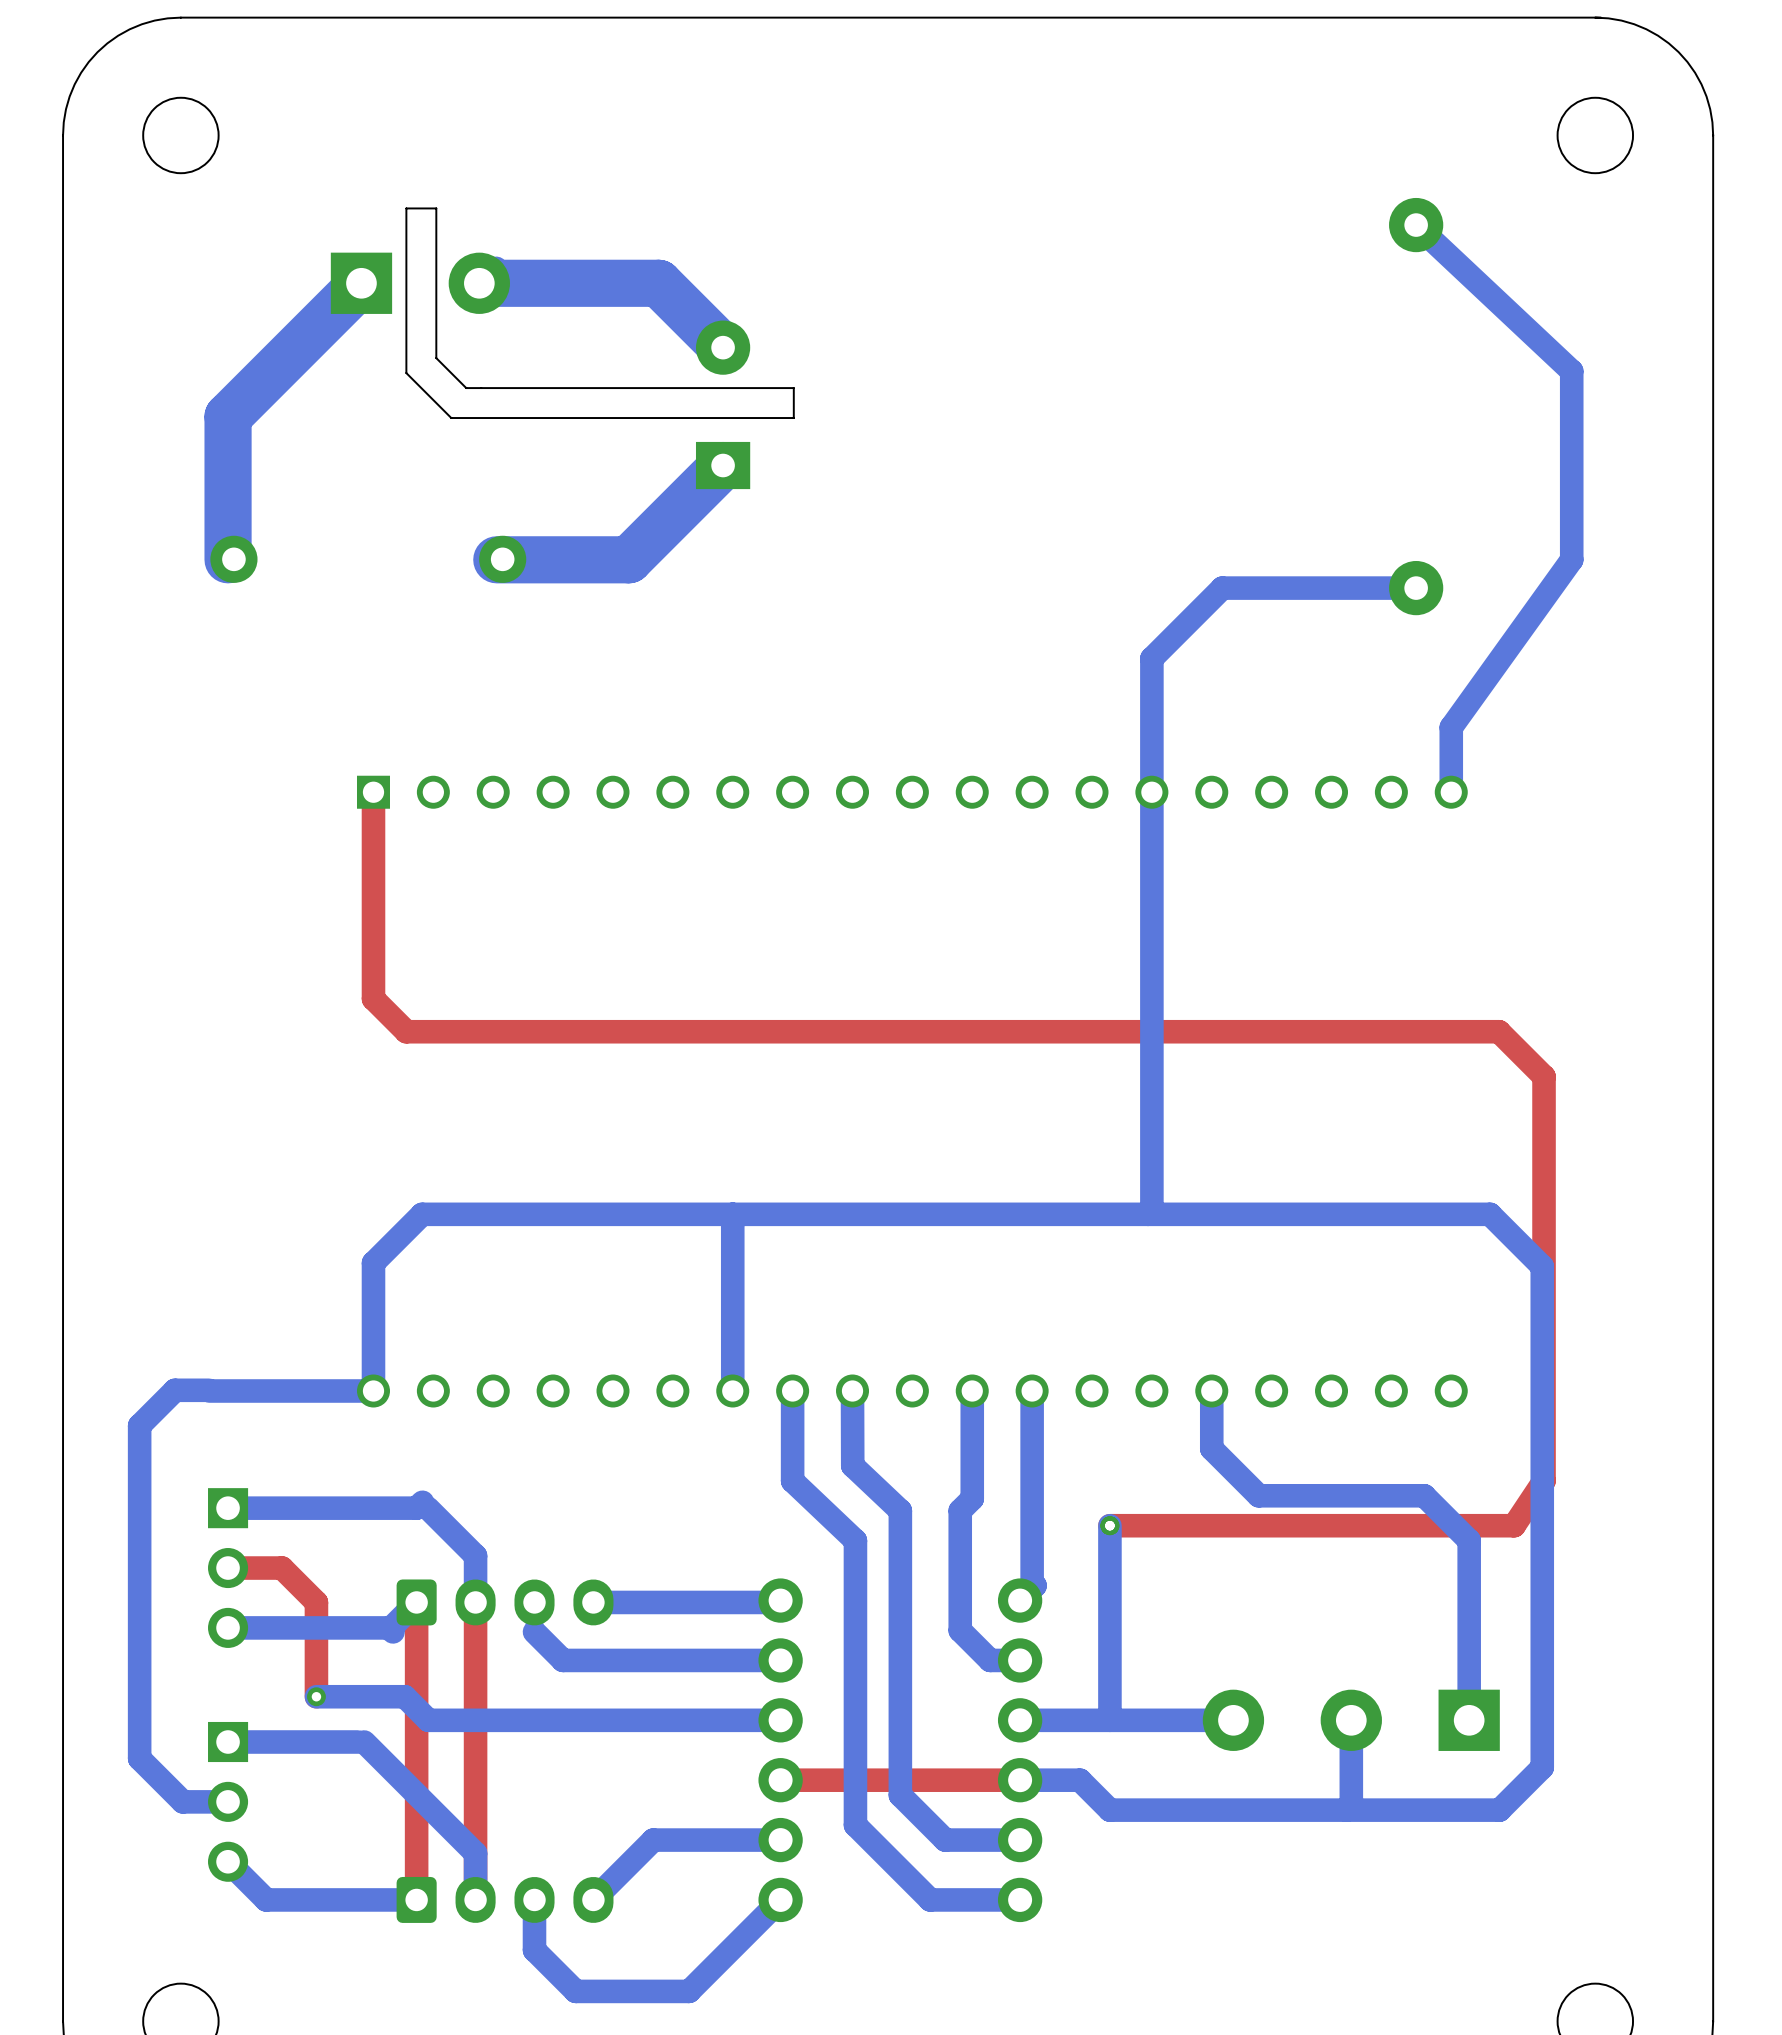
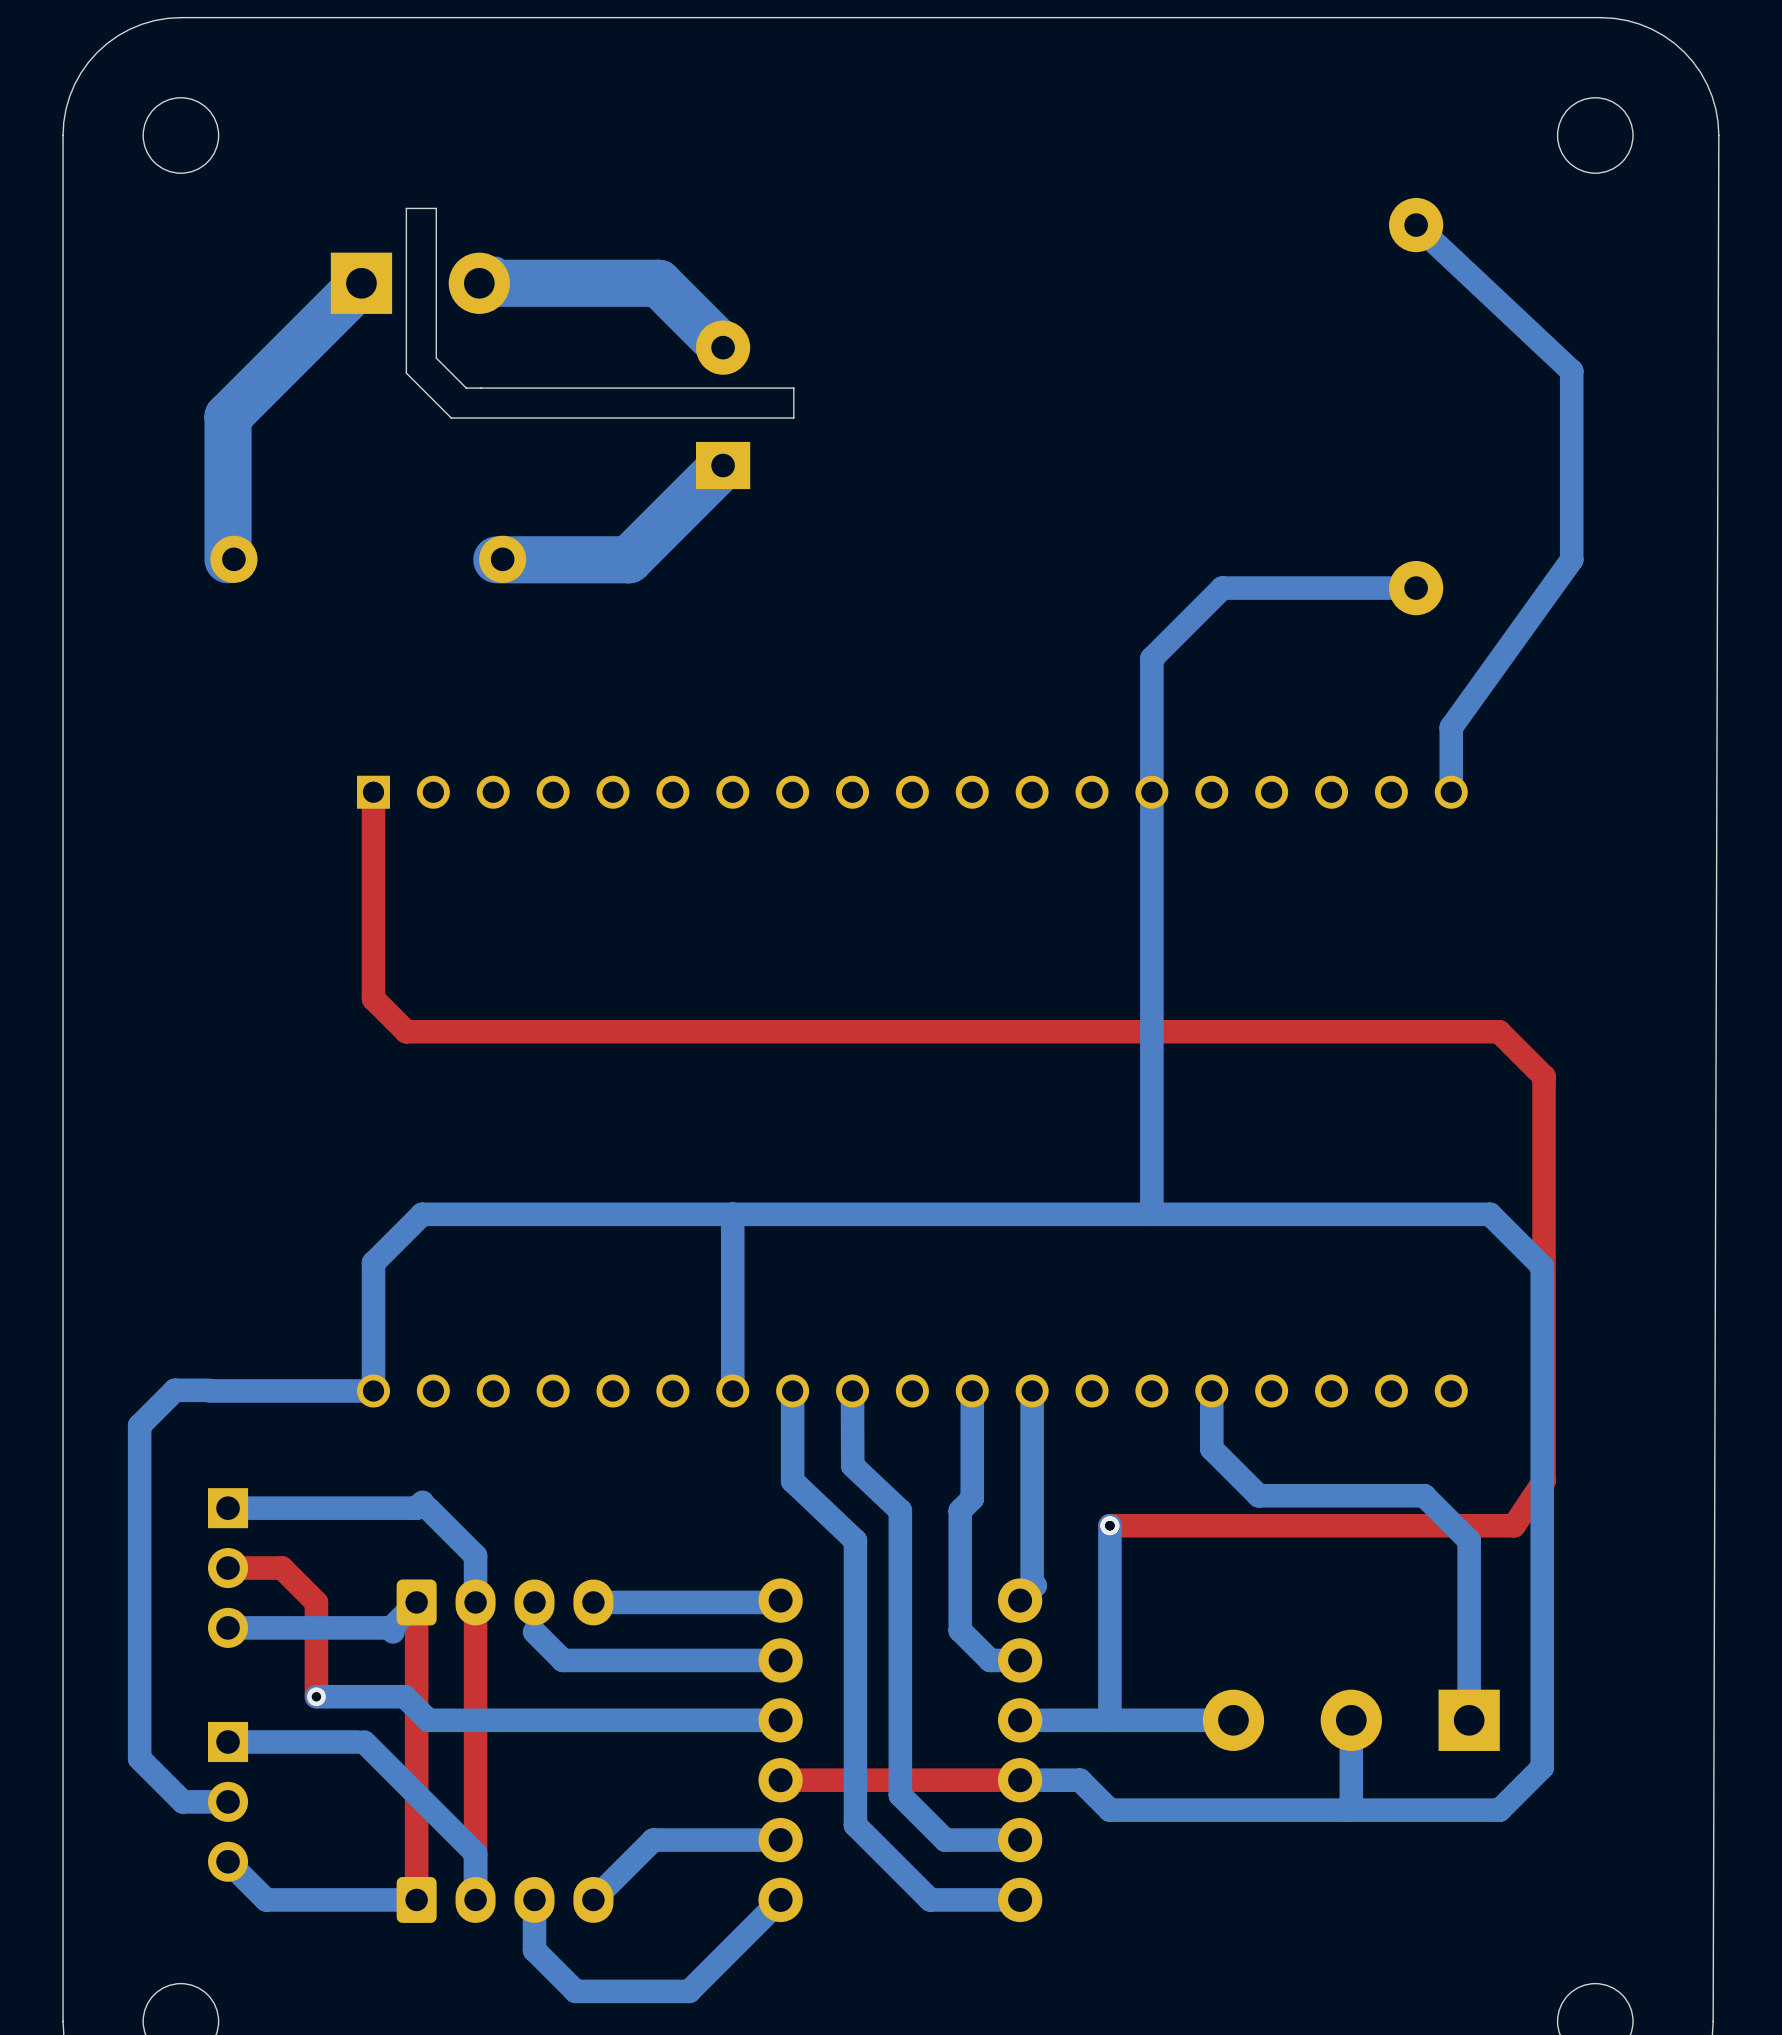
board edge: (1595, 17) (1621, 20) (1646, 29) (1678, 52) (1695, 72) (1706, 96) (1713, 135) -> none
board edge: (1713, 135) (1713, 2021) -> (1600, 17) (1627, 20) (1652, 29) (1684, 52) (1700, 72) (1712, 96) (1718, 135) (1713, 2021)

